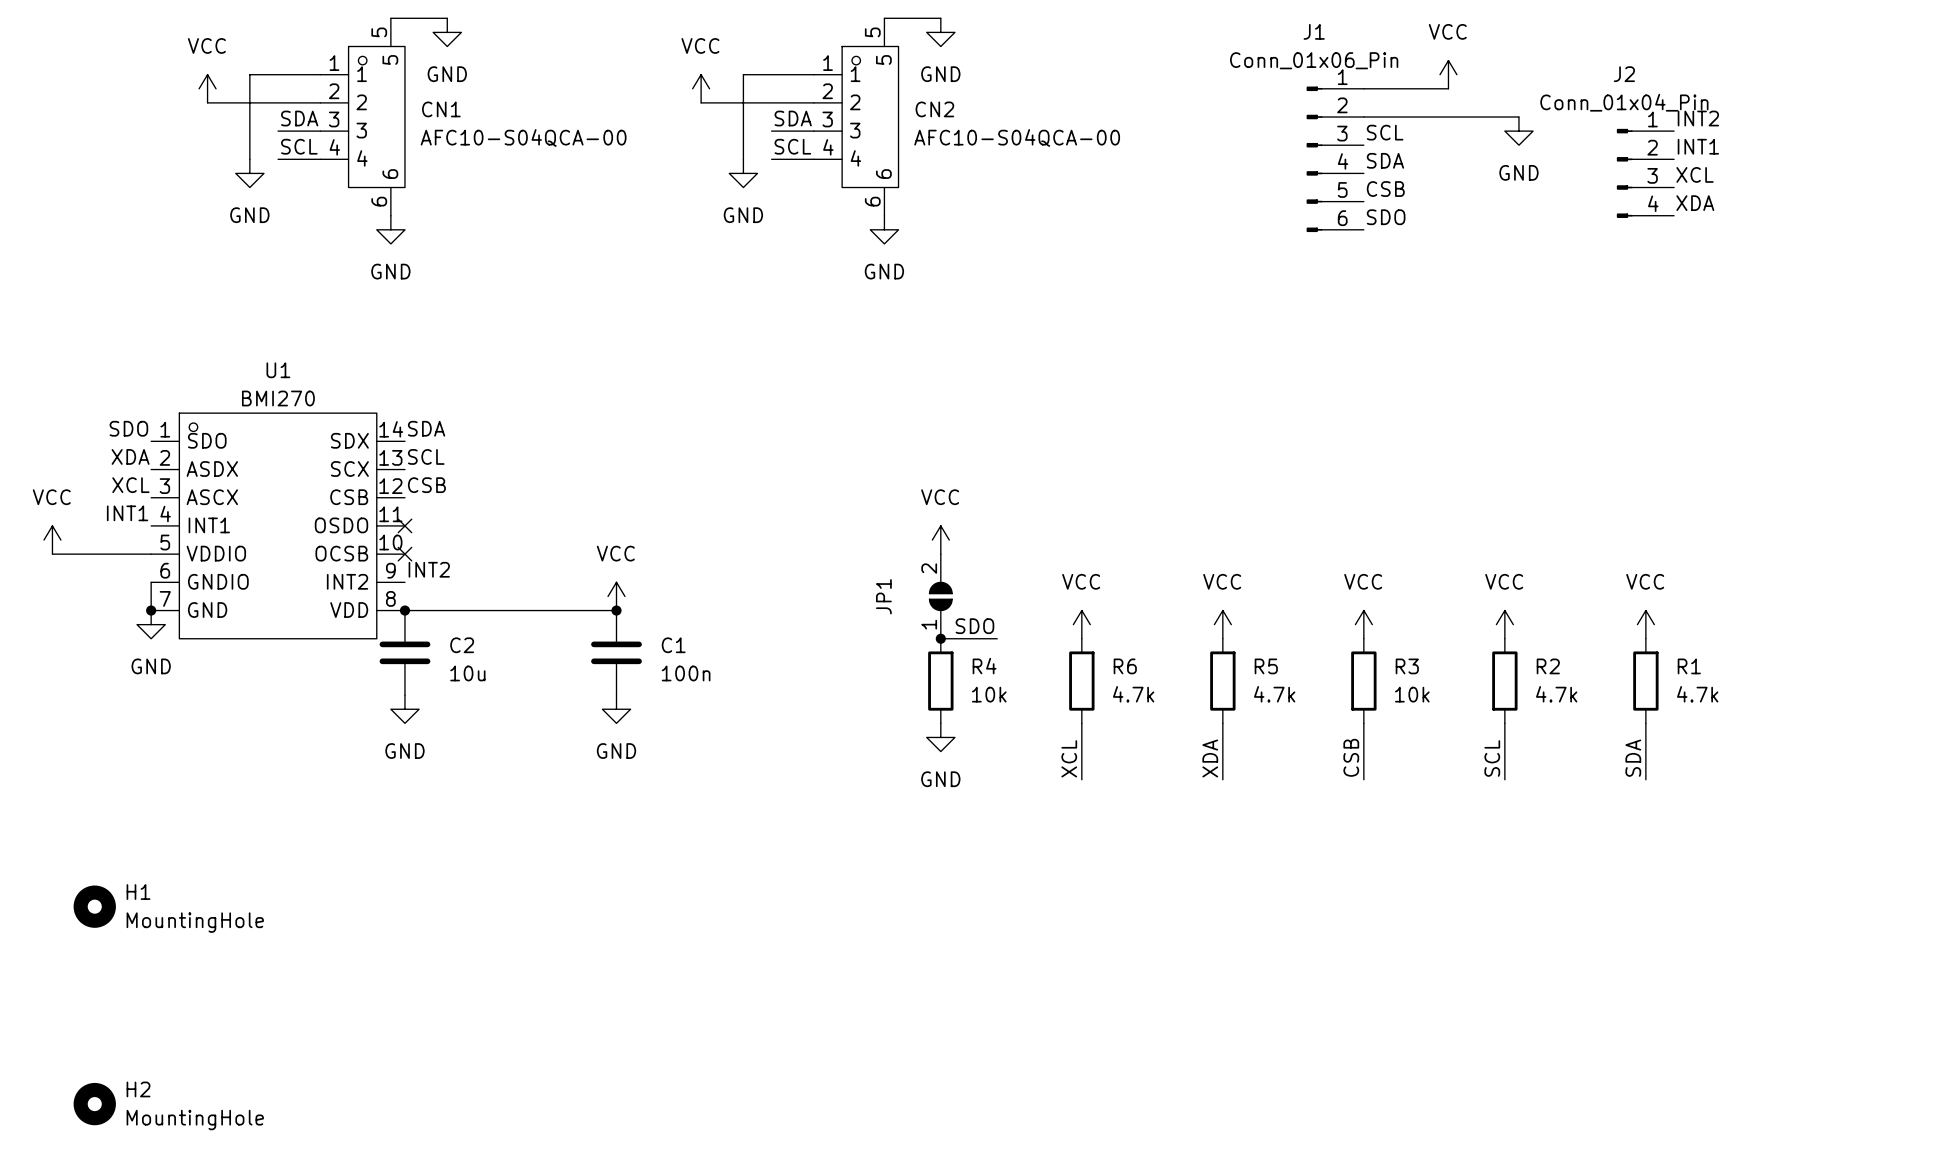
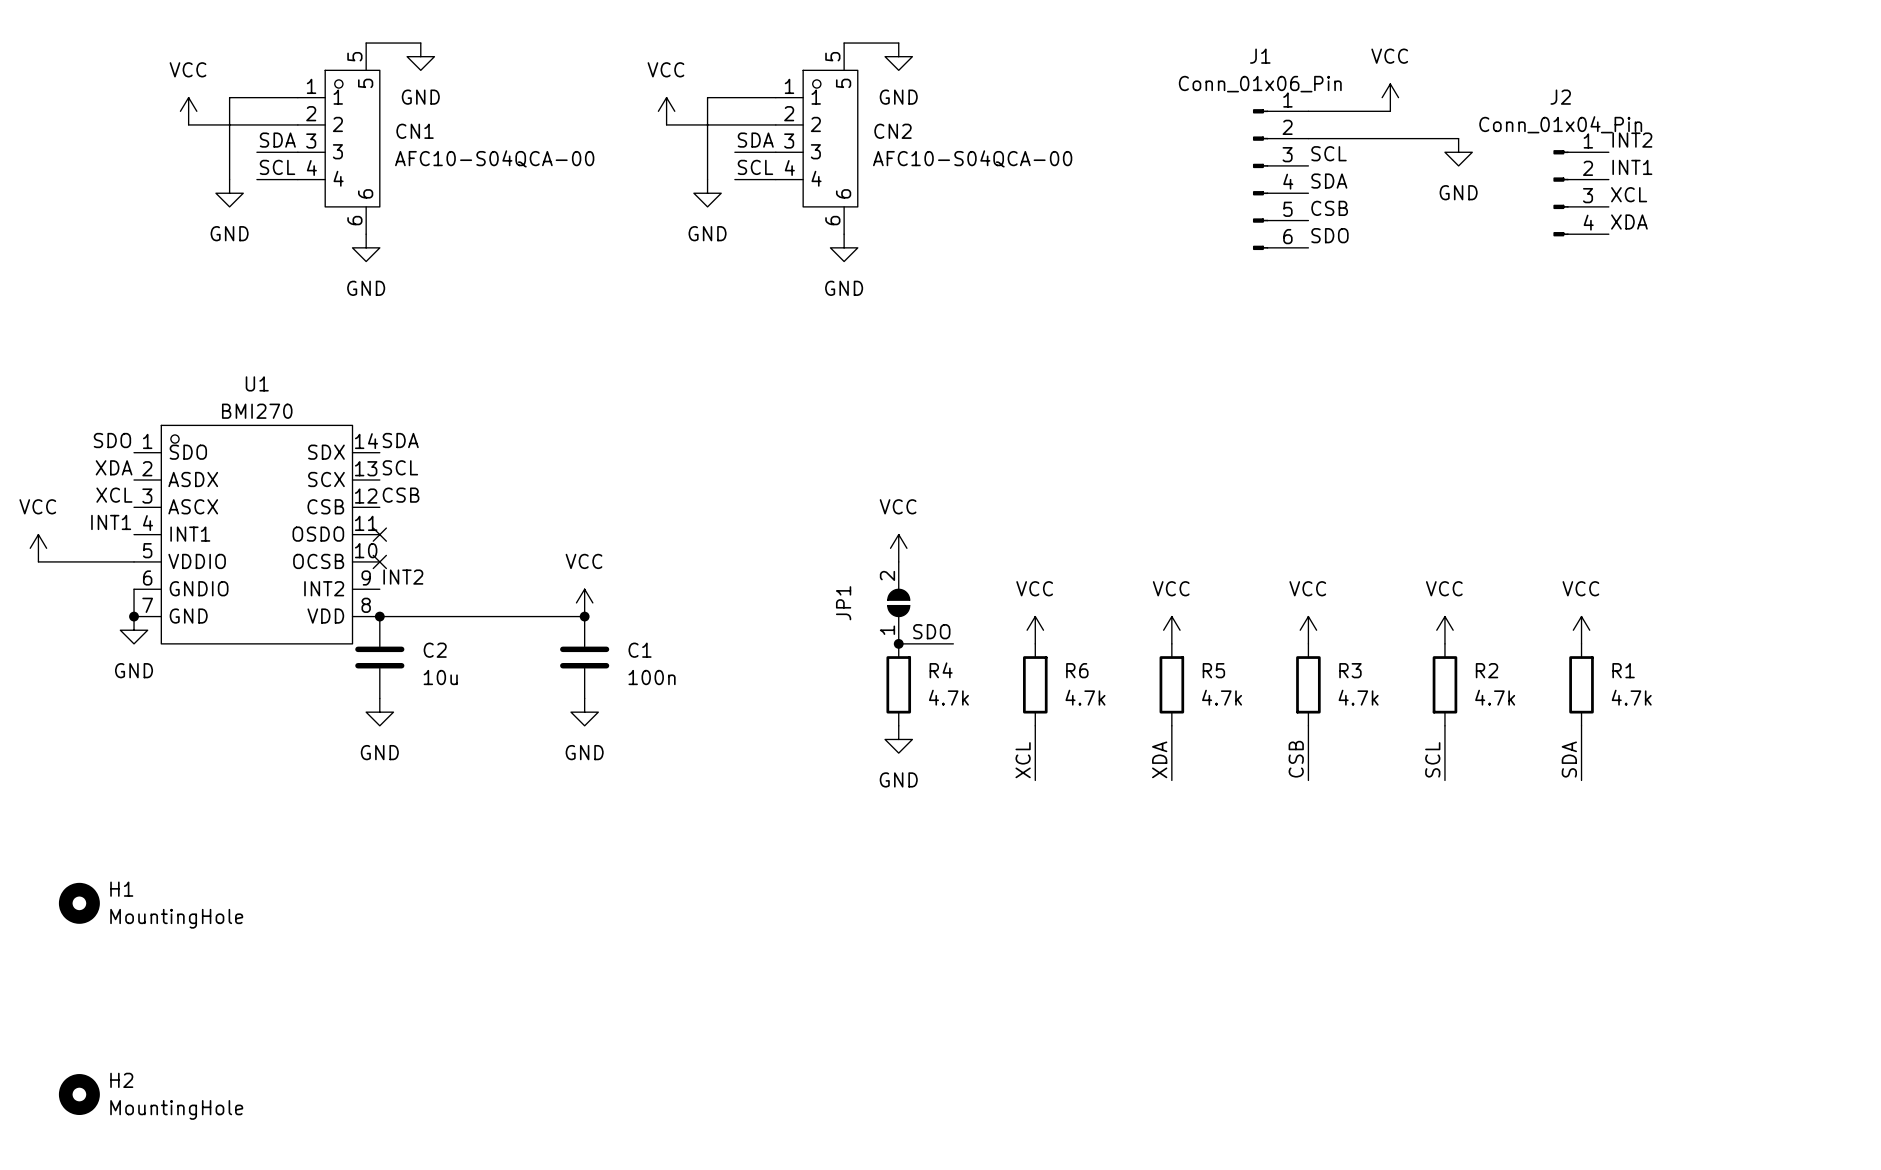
R4 value: 10k (989, 694) -> 4.7k (948, 697)
R3 value: 10k (1412, 694) -> 4.7k (1358, 697)

